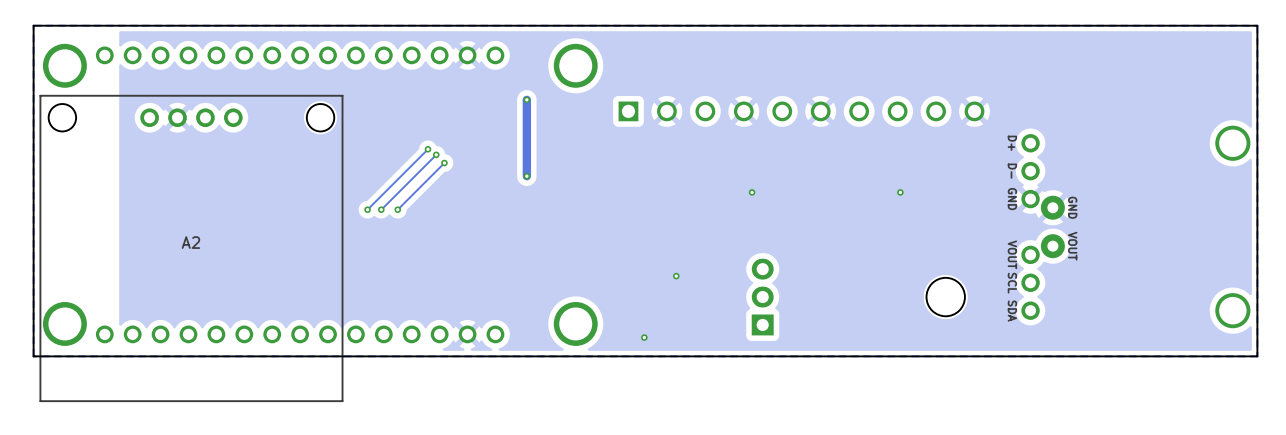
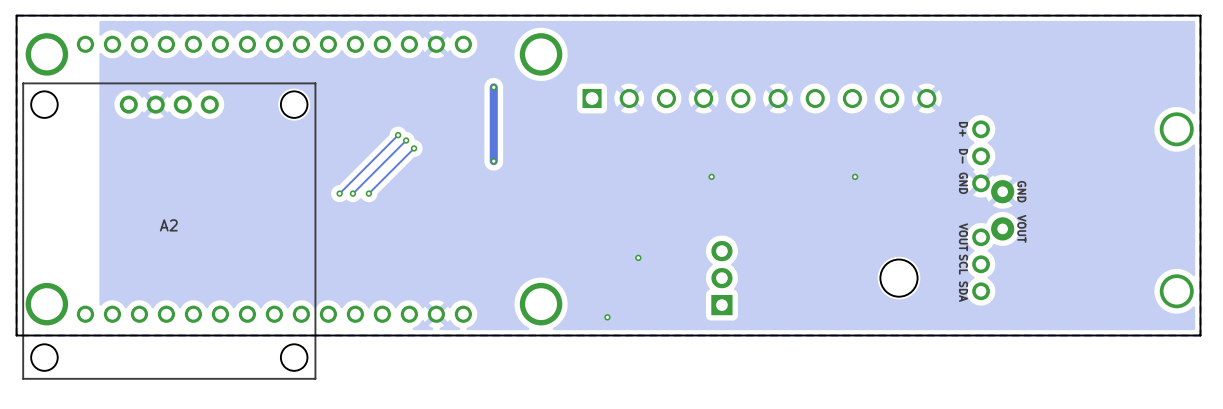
A2 footprint: [39, 95, 344, 402] -> [22, 82, 316, 380]

